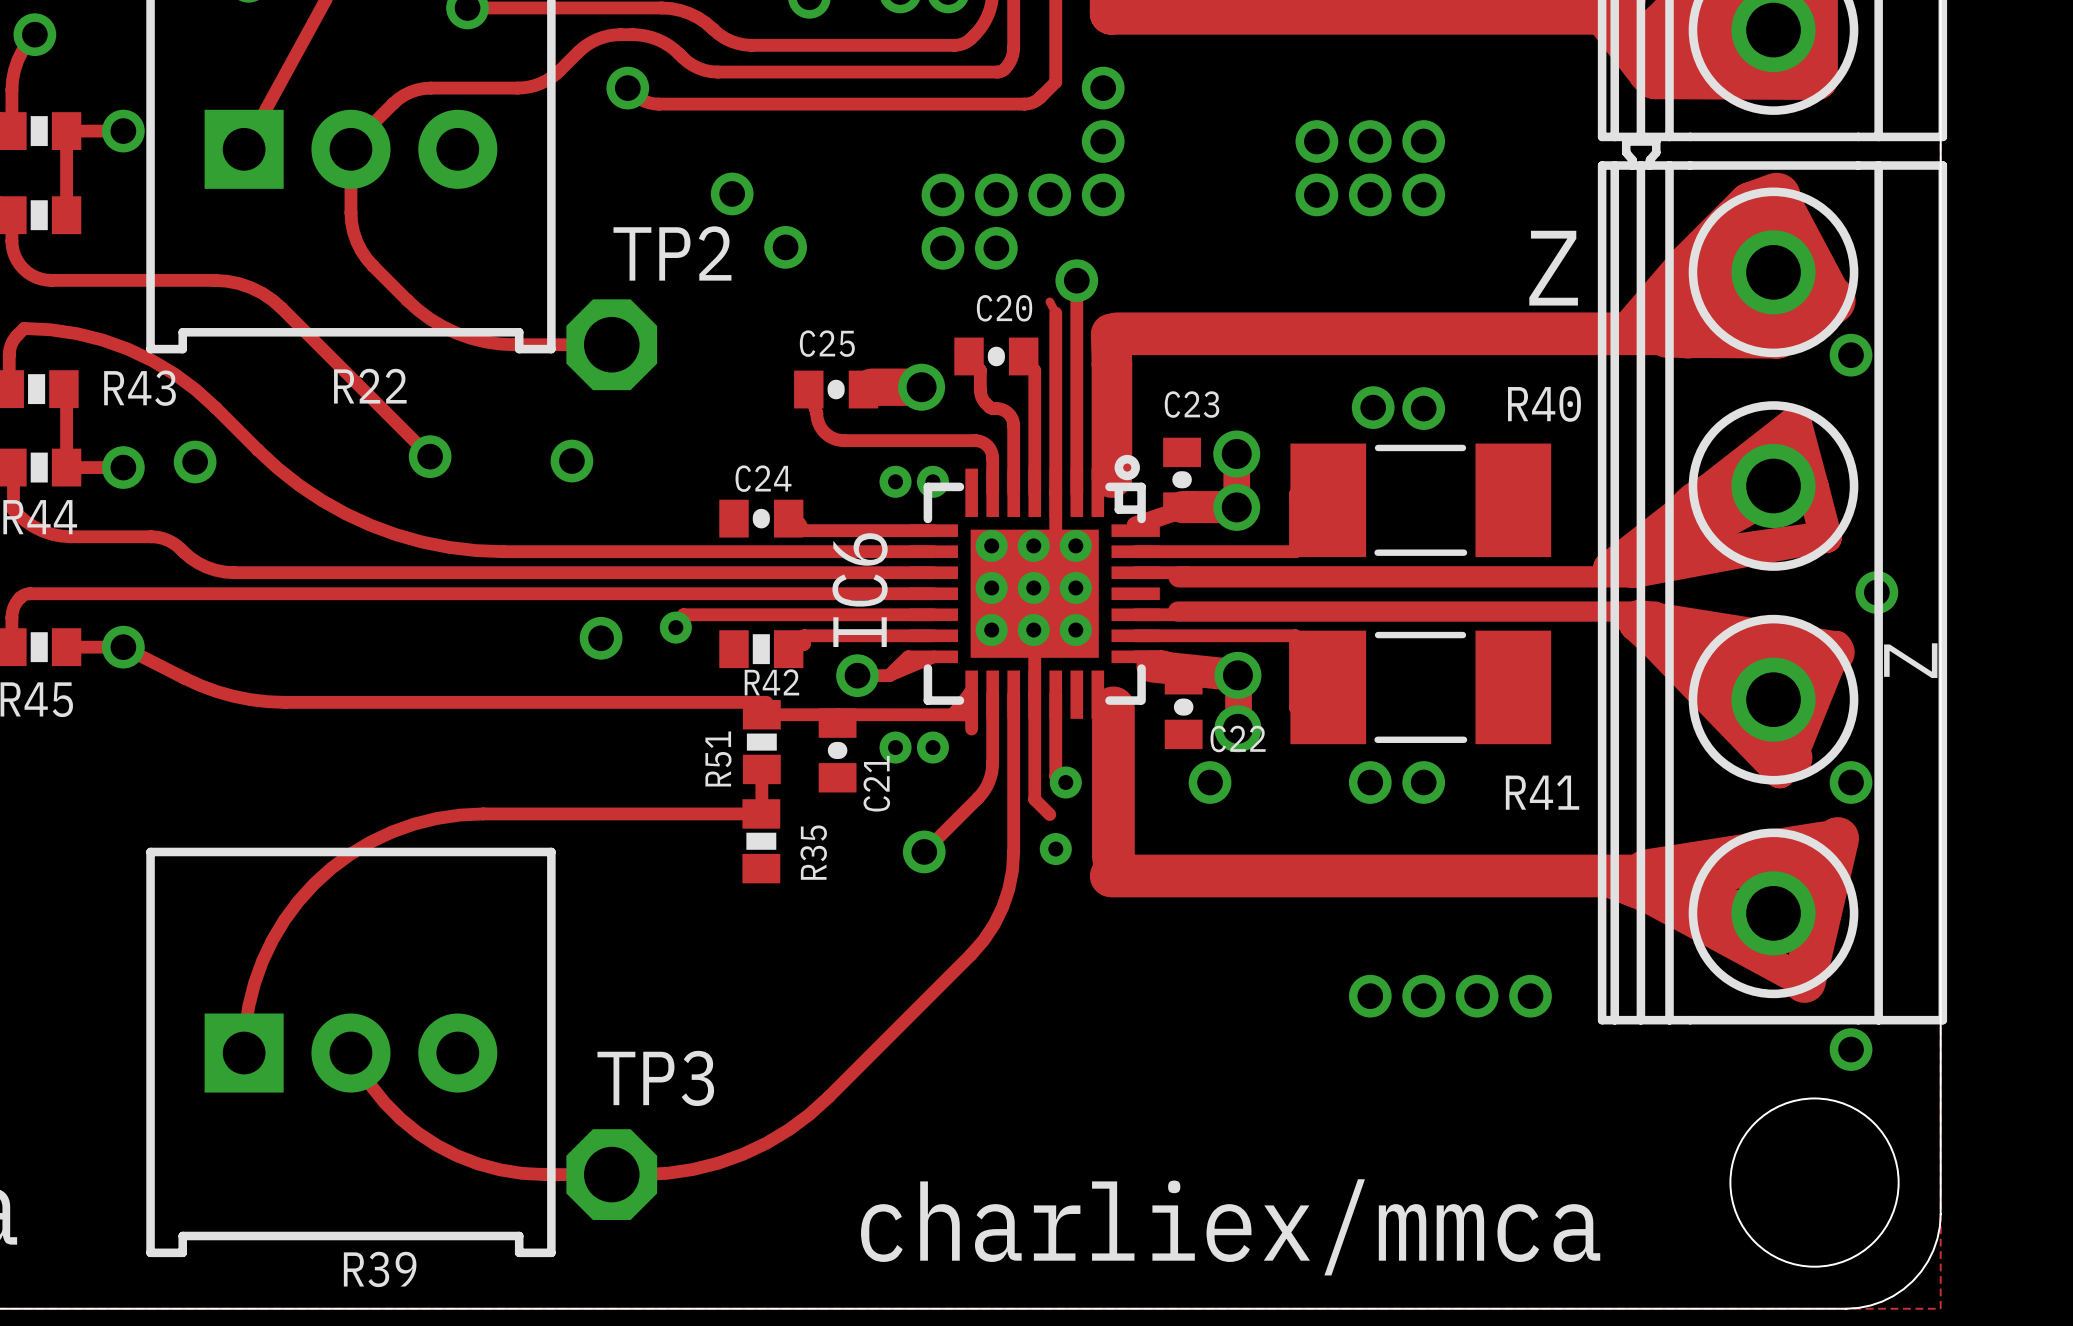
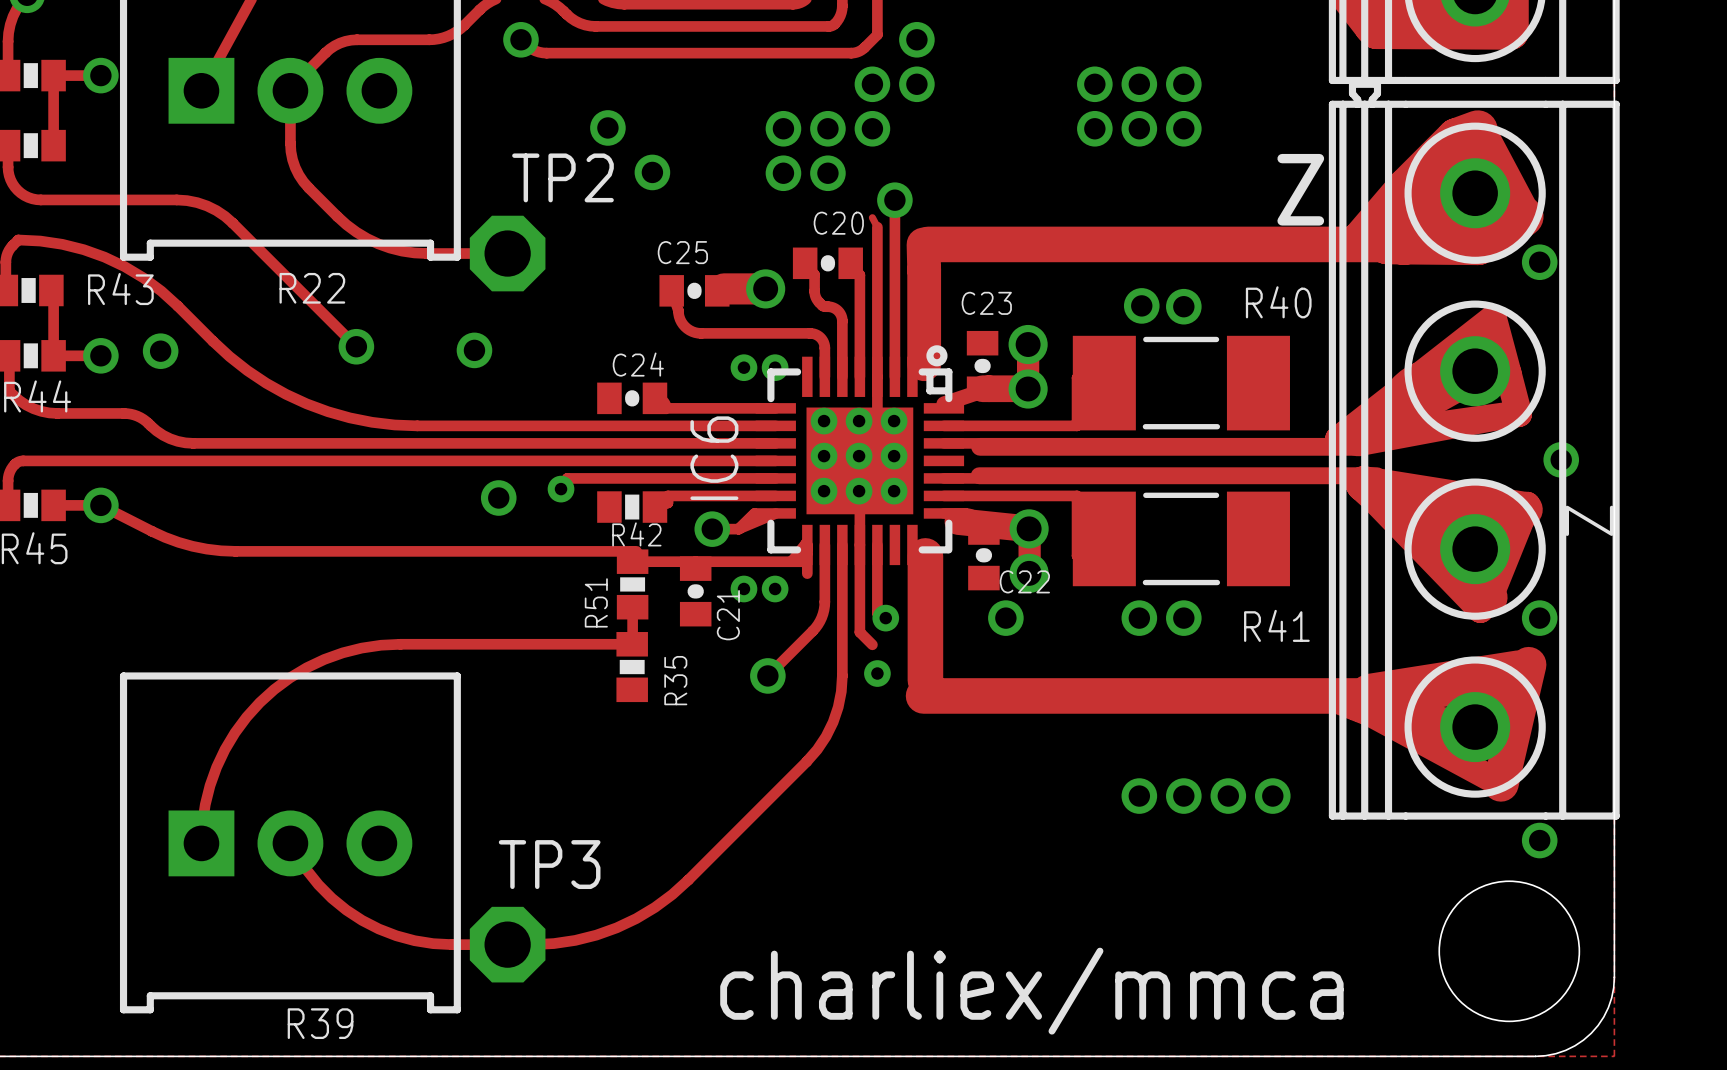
via position: (1103, 194) -> (872, 84)

